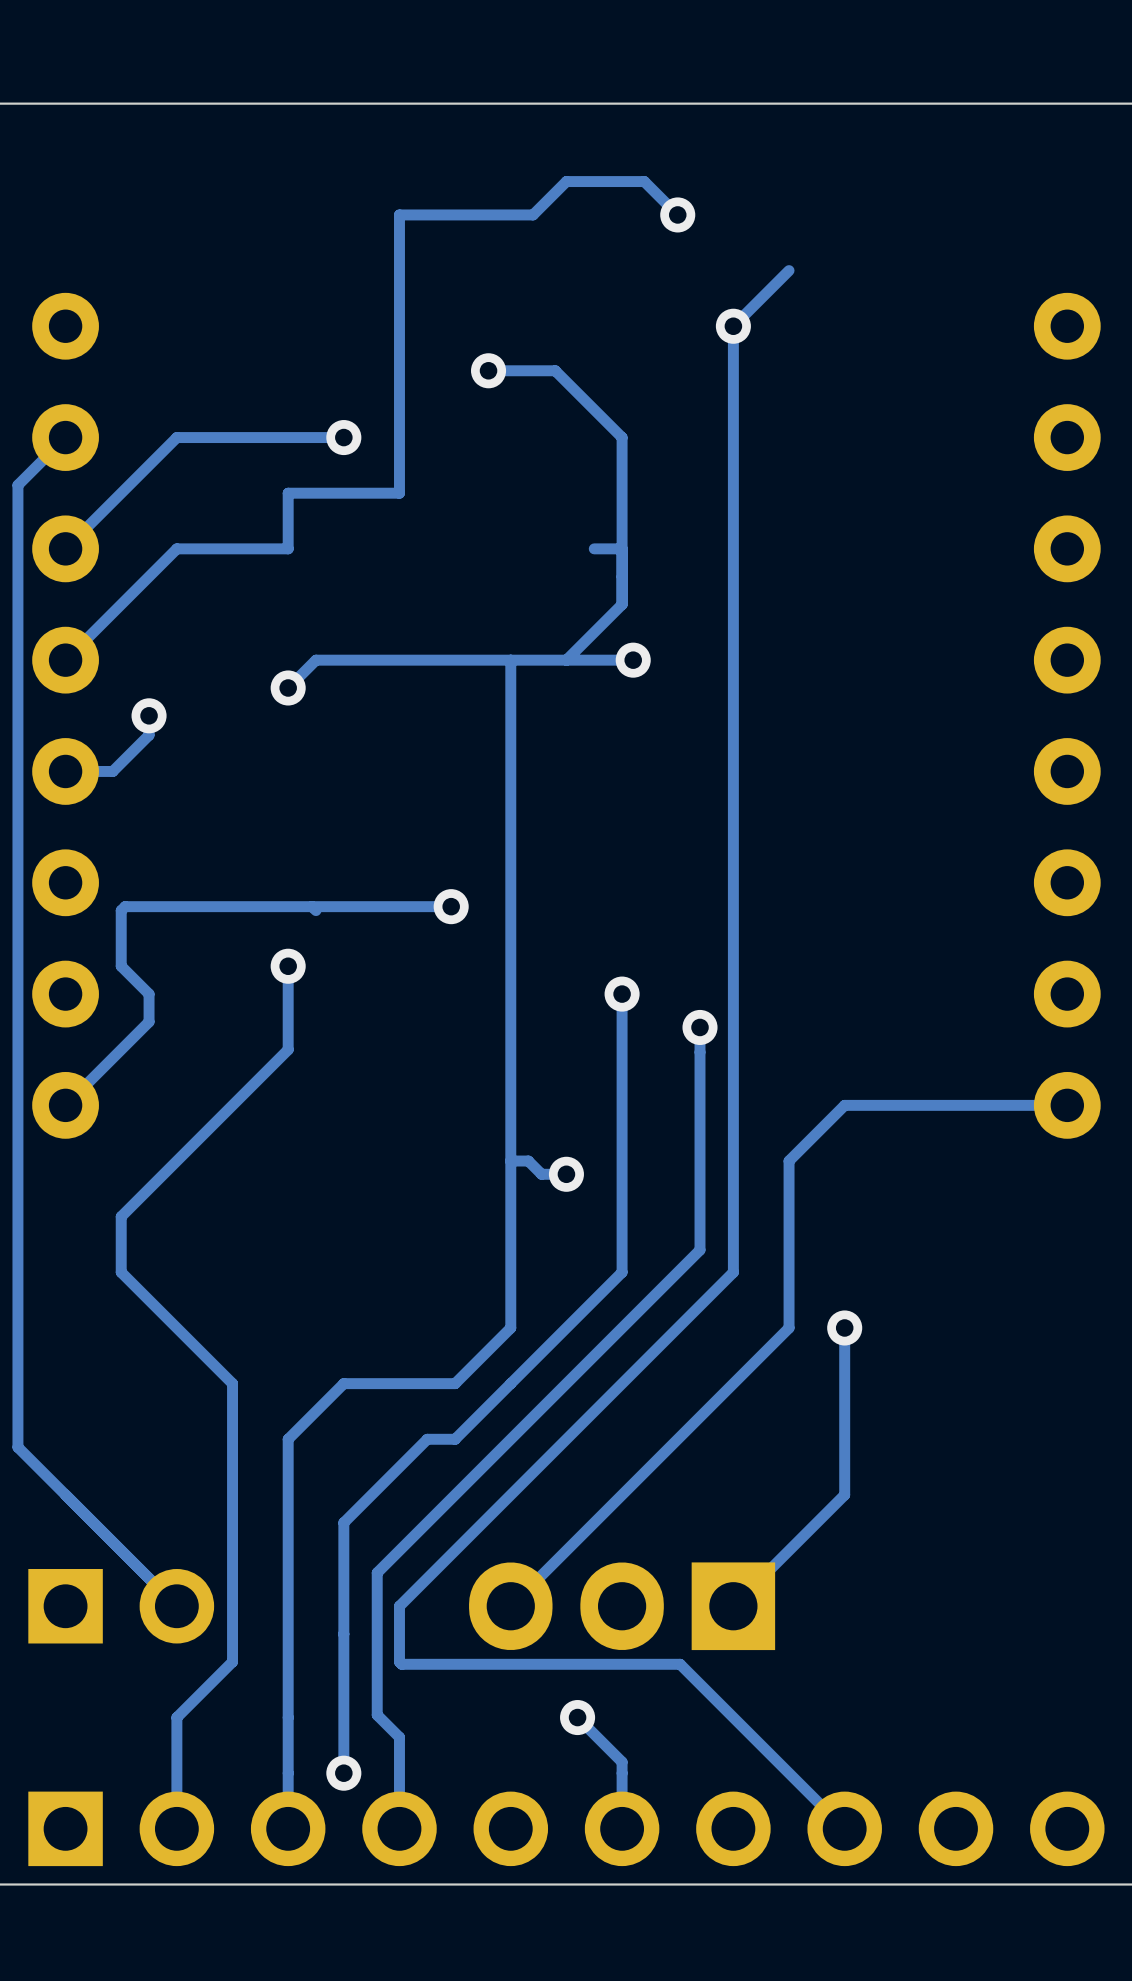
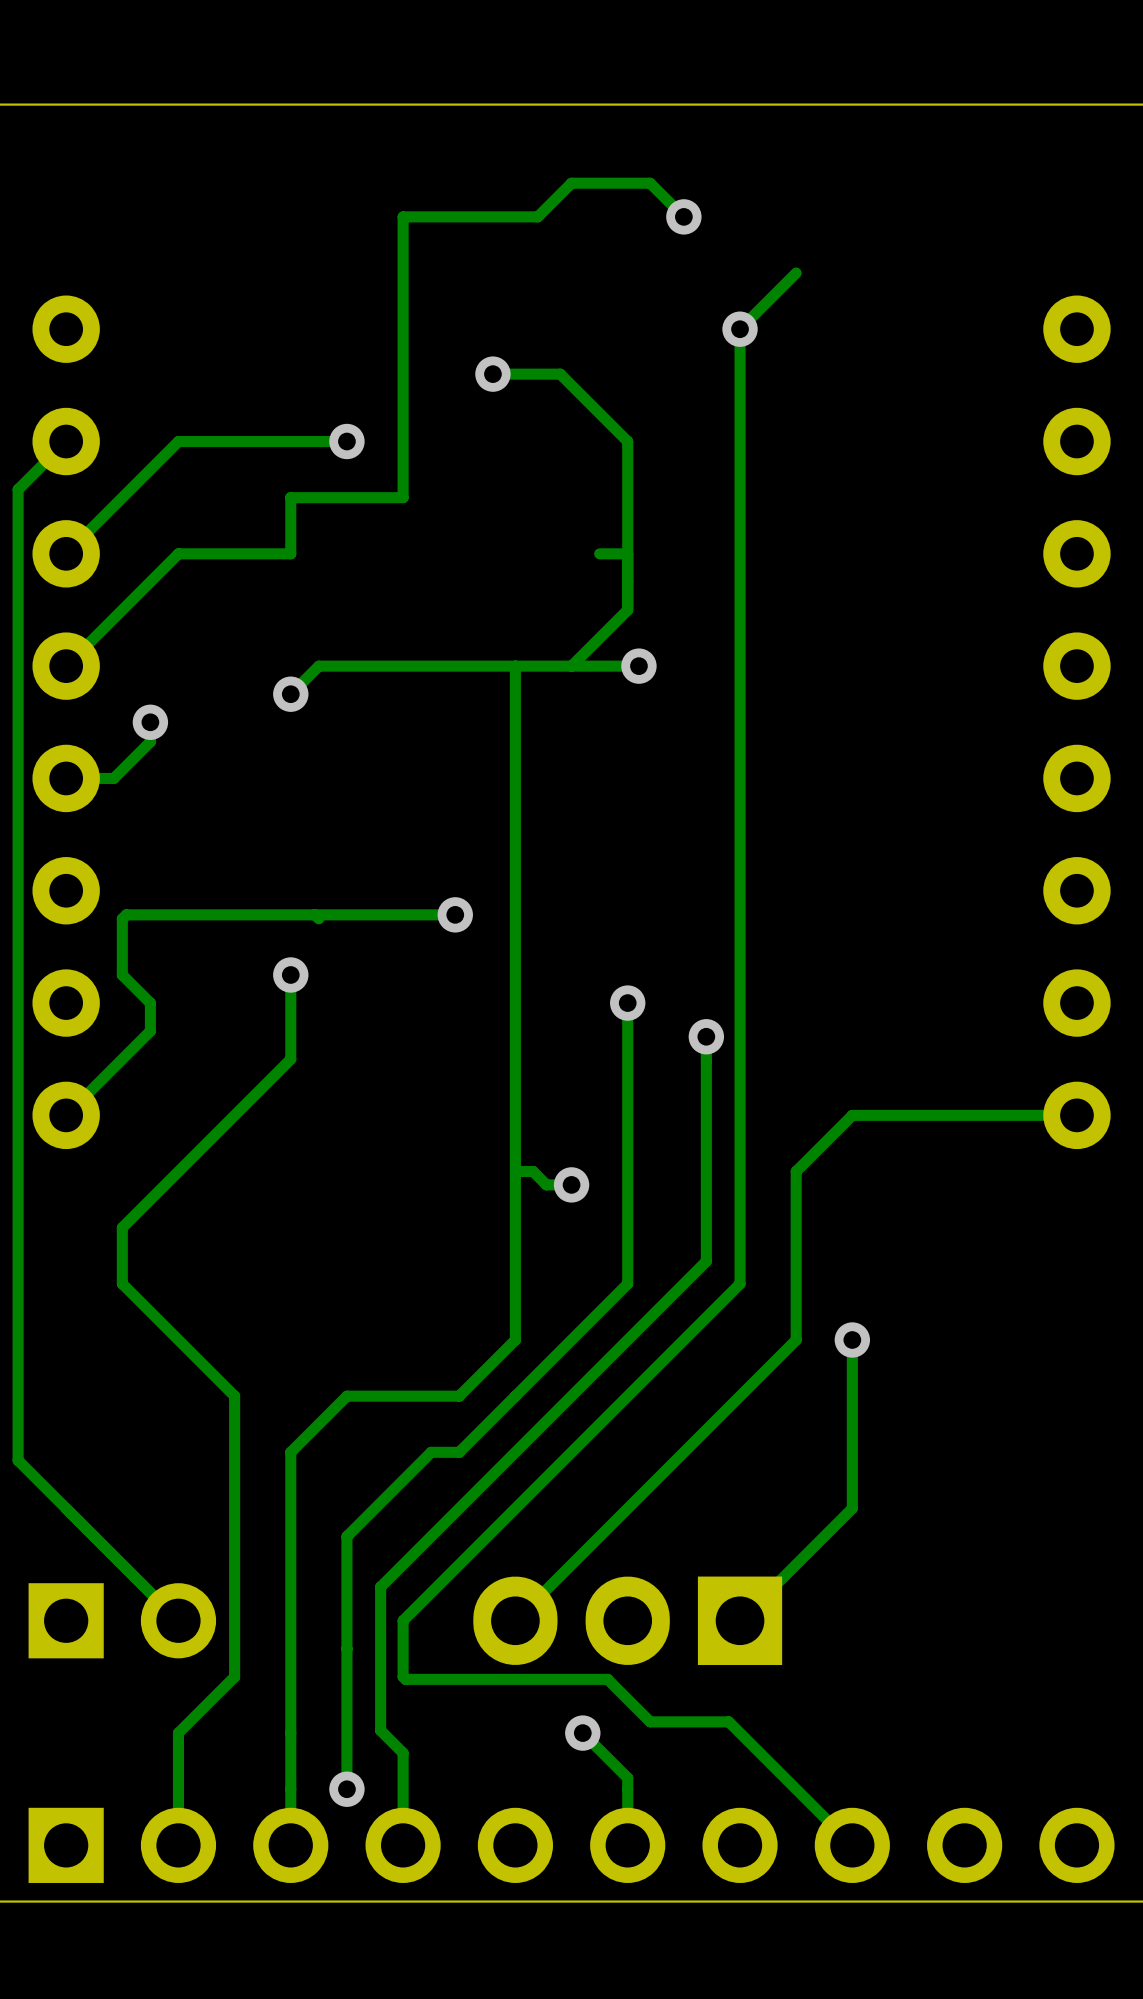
track: (602, 1664) (680, 1664) (722, 1706) -> (607, 1679) (650, 1721) (728, 1721)

